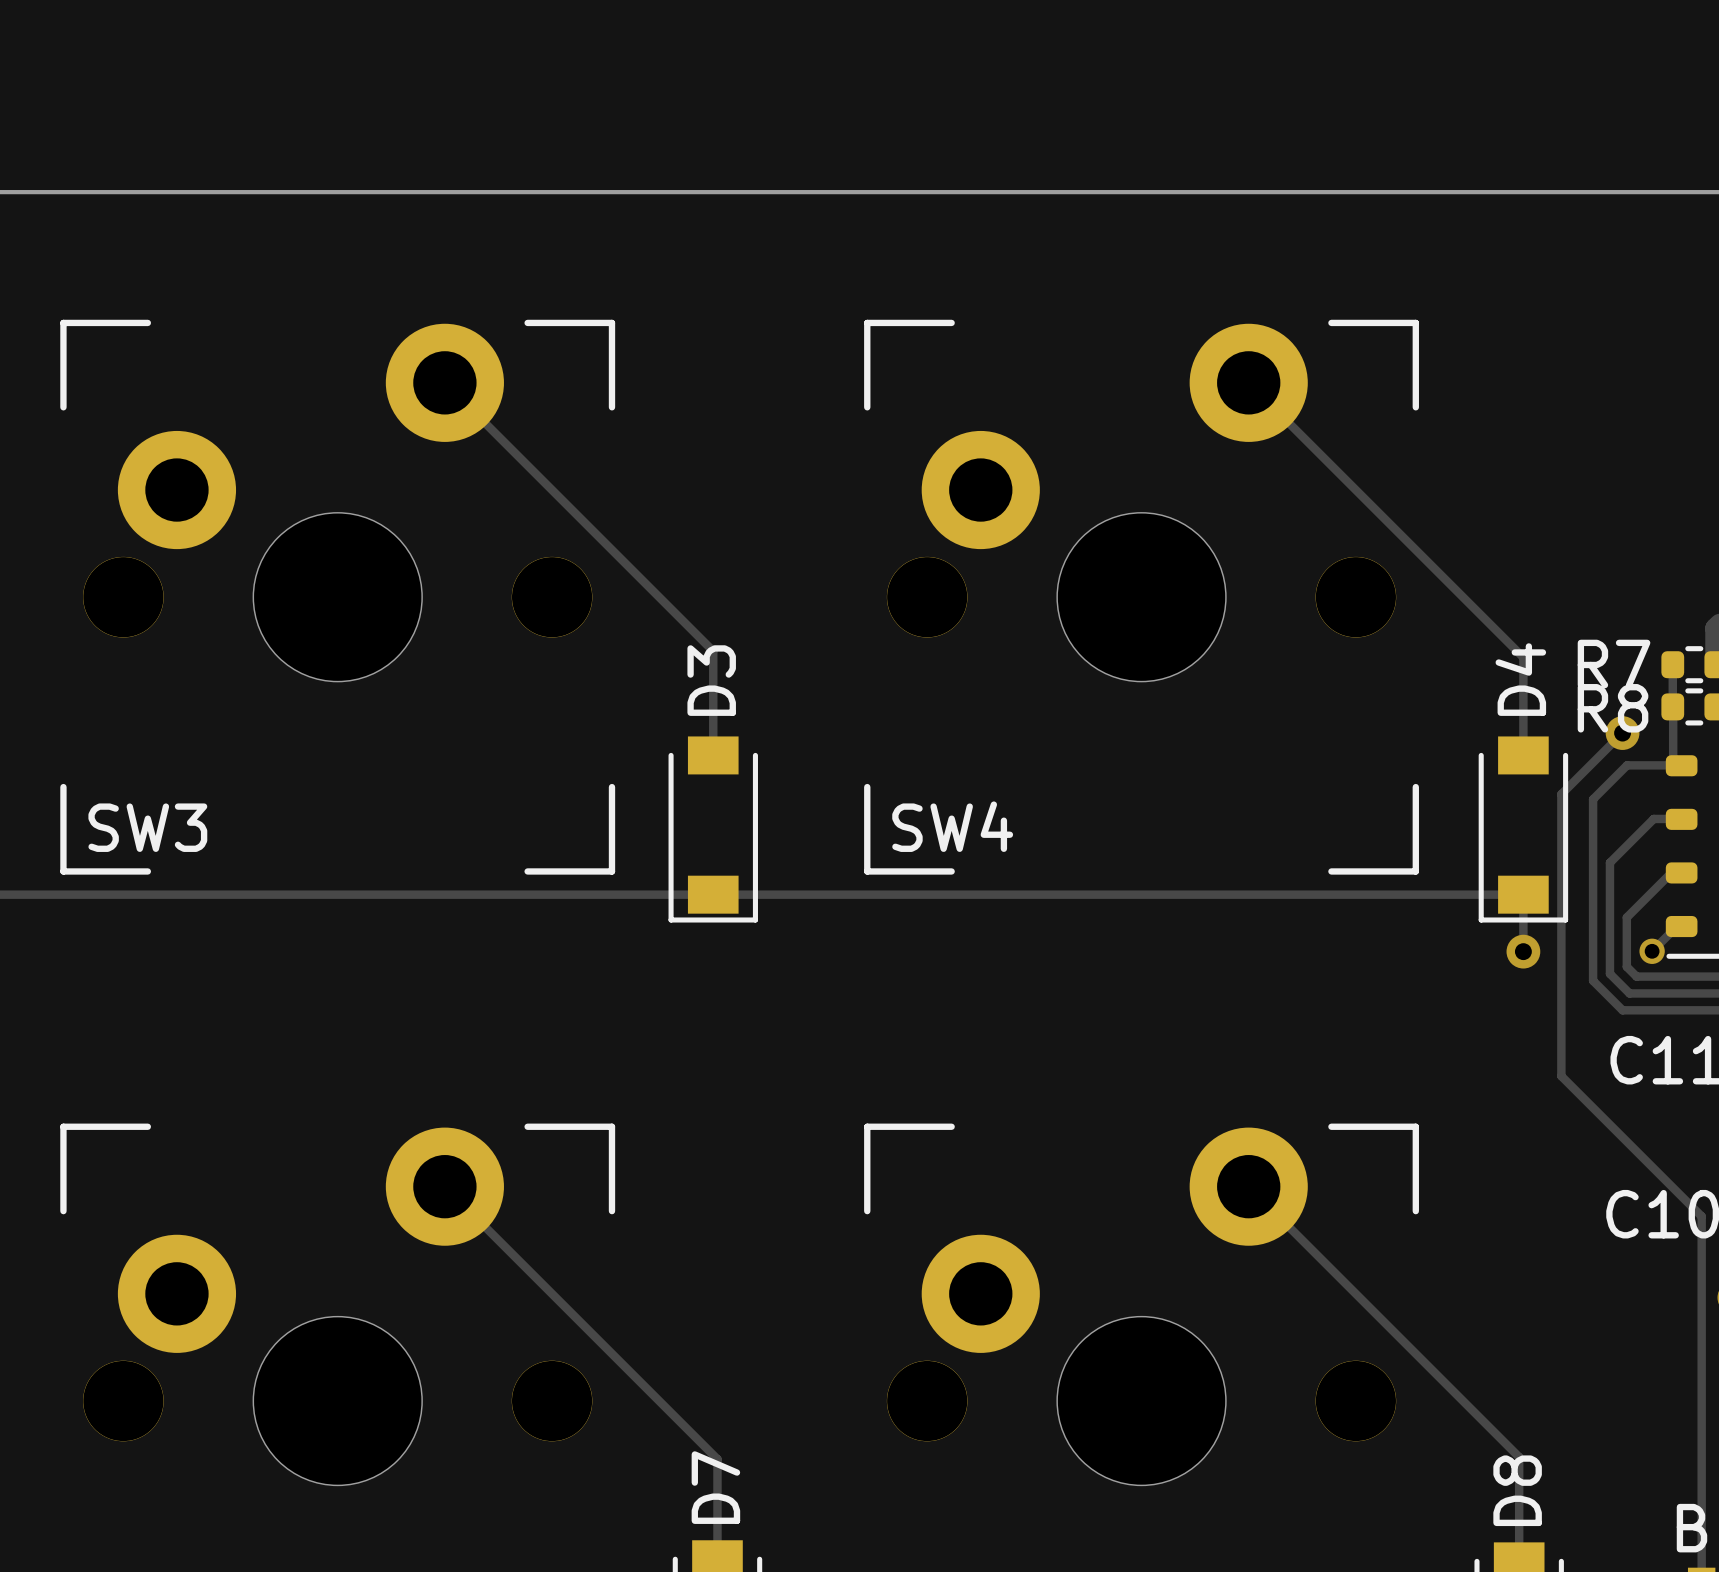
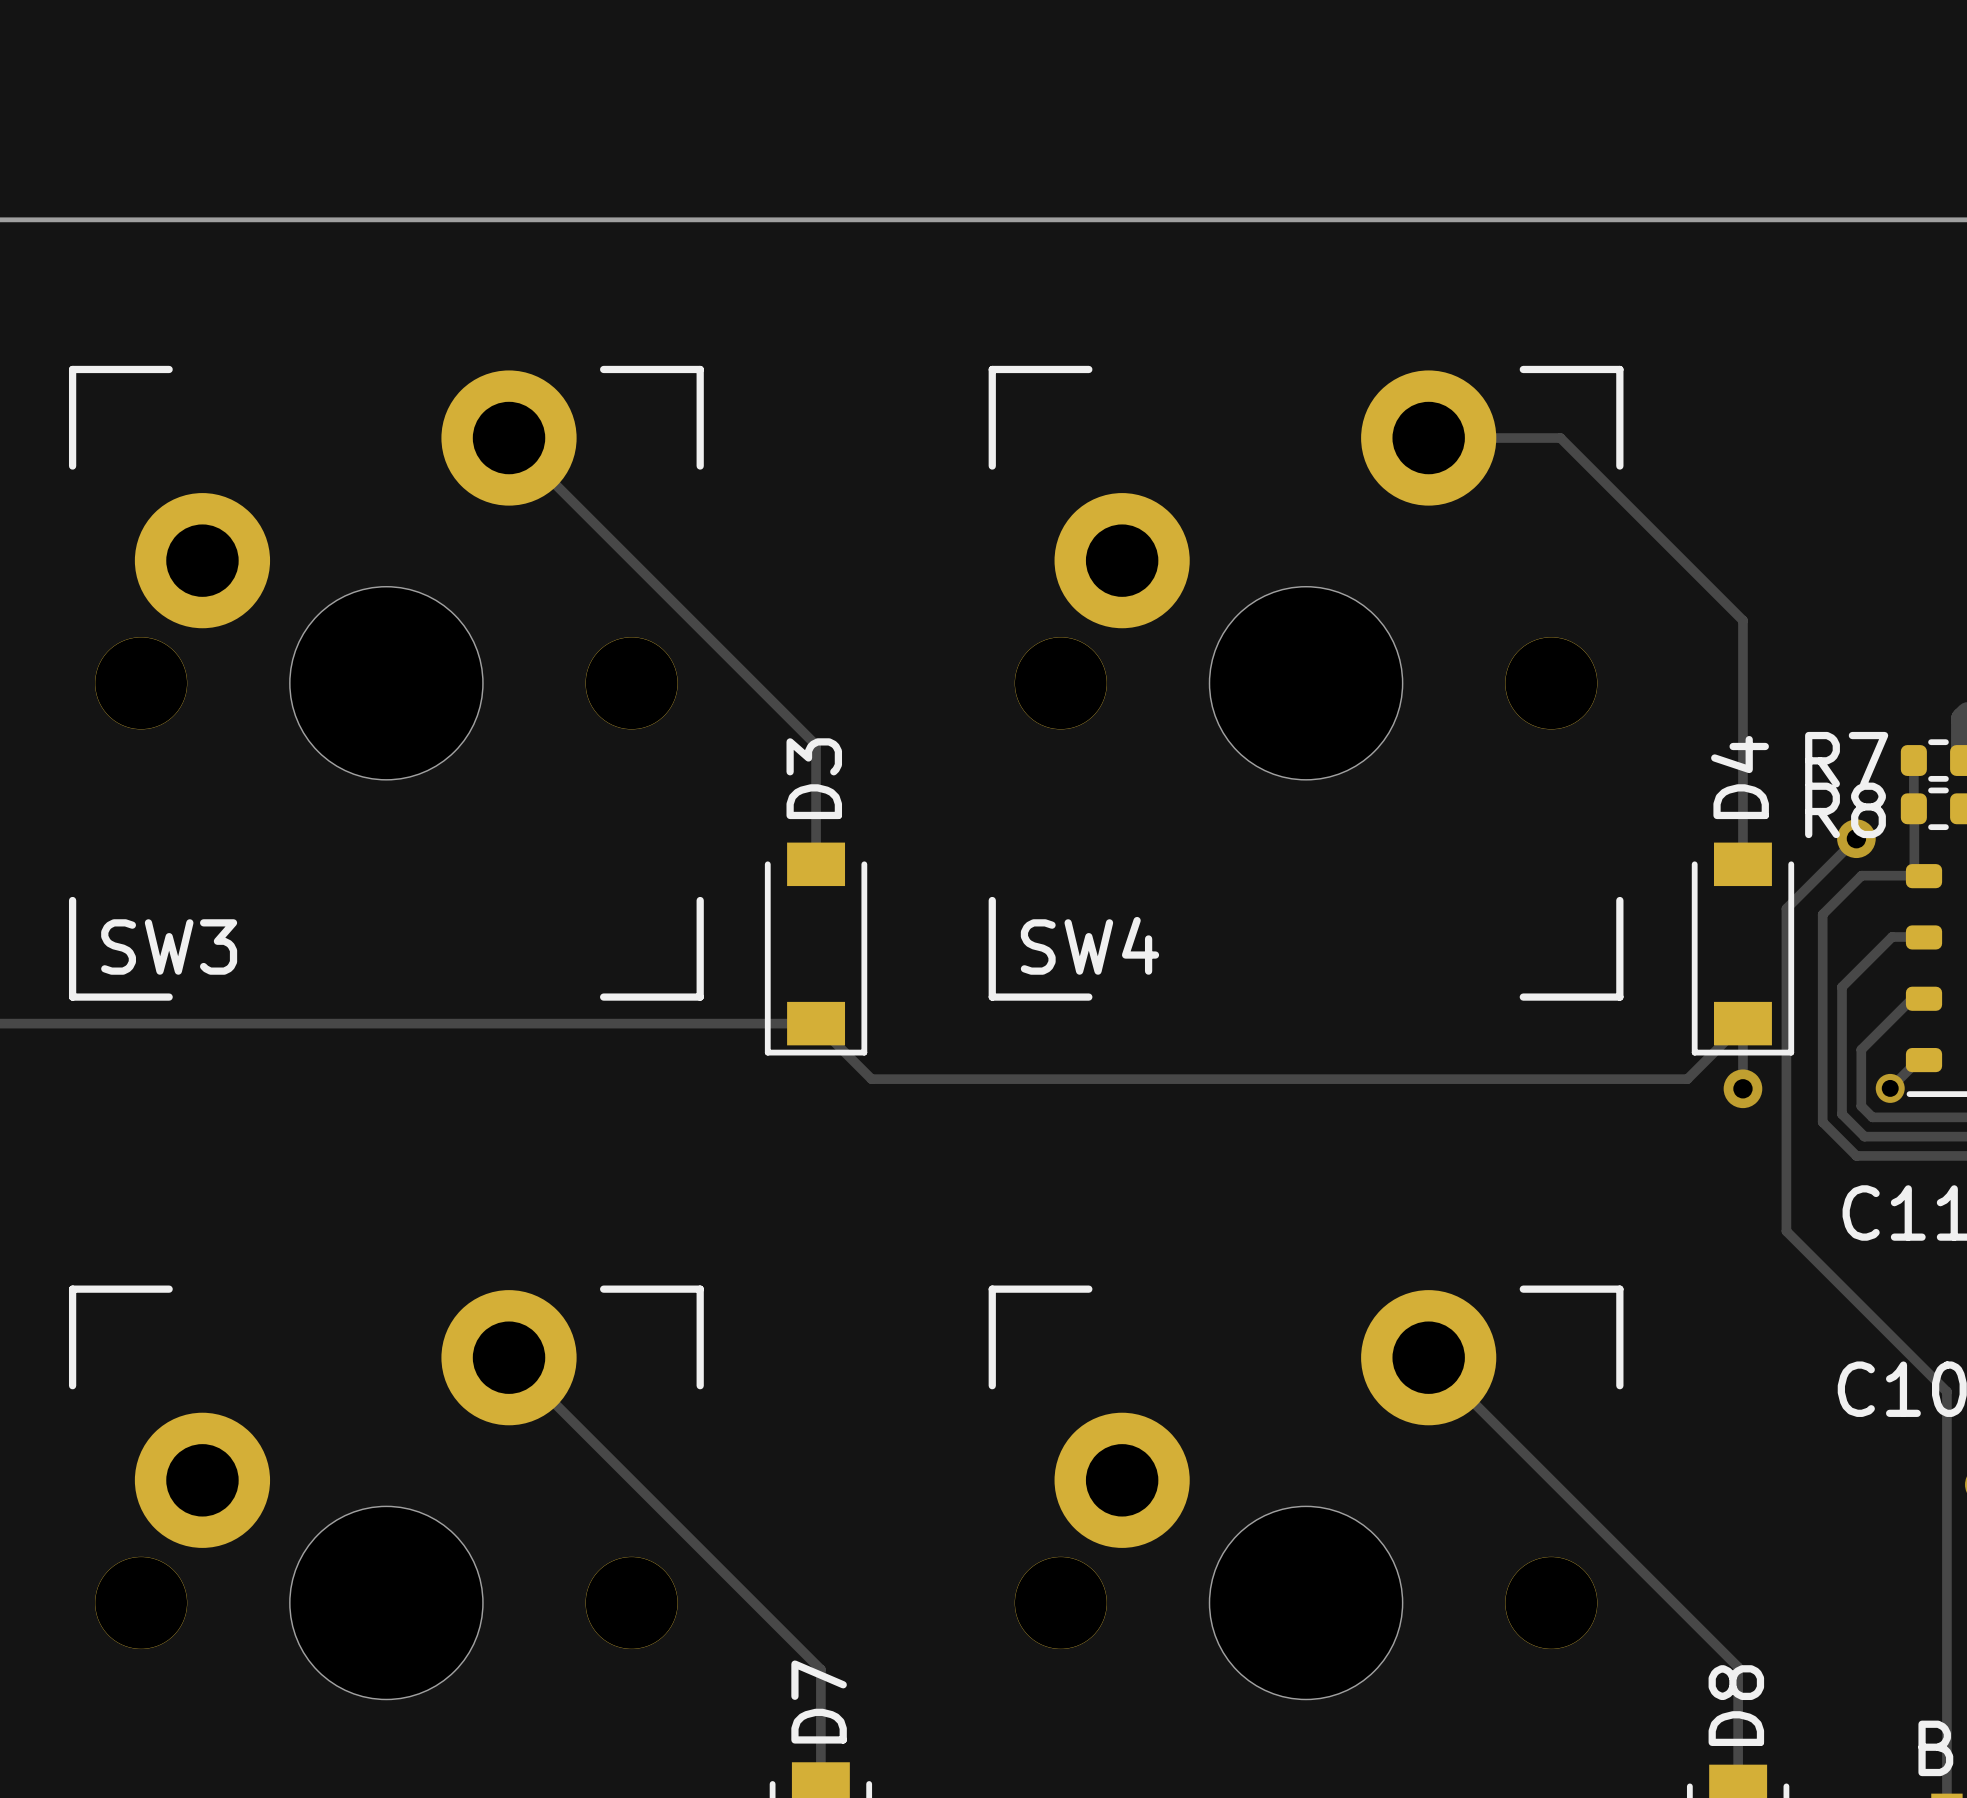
track: (1248, 382) (1523, 657) -> (1428, 438) (1560, 438) (1742, 620) (1742, 752)
track: (713, 894) (1523, 894) -> (816, 1023) (871, 1079) (1687, 1079) (1742, 1023)

